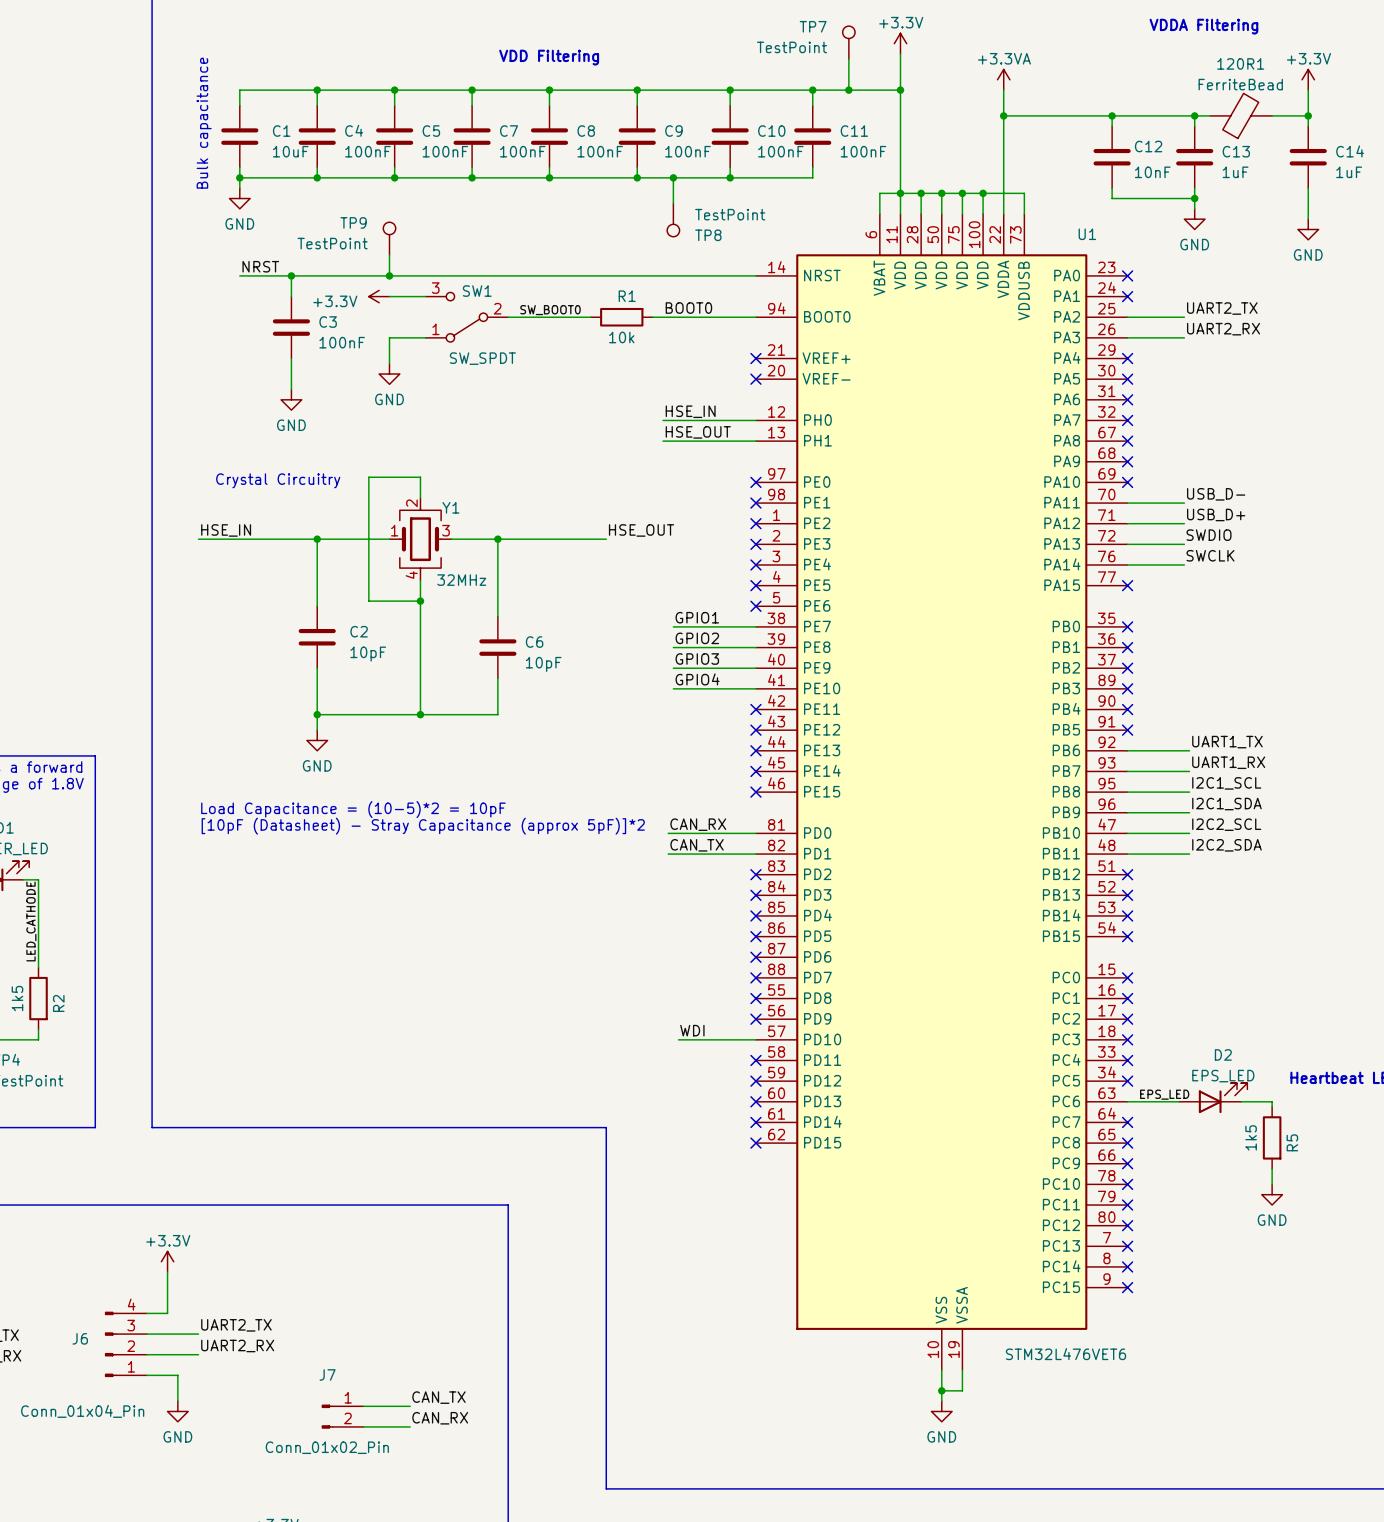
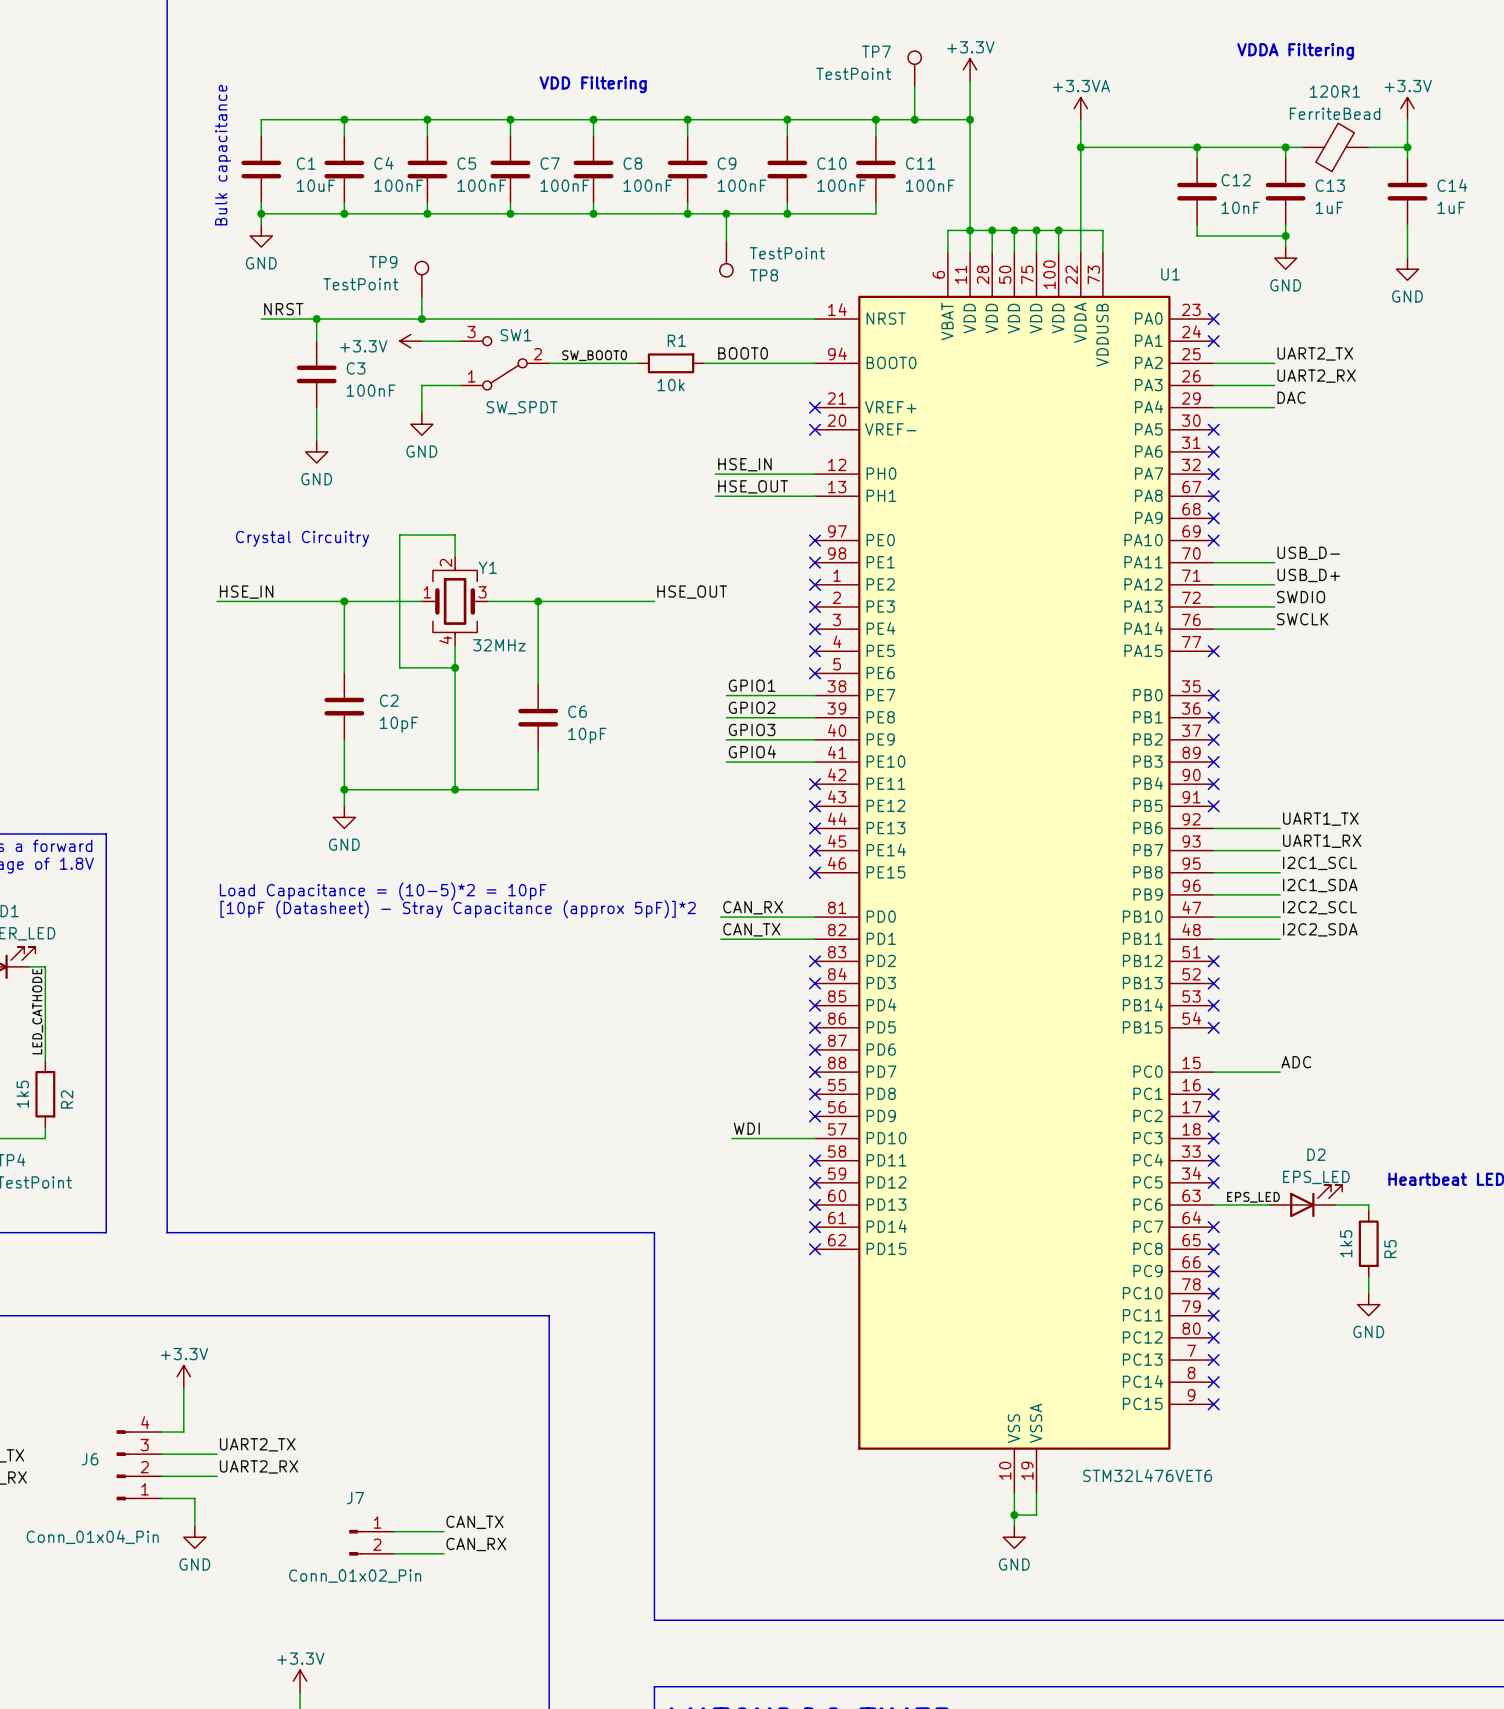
label: none -> DAC (1291, 397)
wire: none -> (1213, 407) (1274, 407)
no-connect mark: (1127, 358) -> none
label: none -> ADC (1296, 1062)
wire: none -> (1213, 1072) (1280, 1072)
no-connect mark: (1127, 977) -> none

